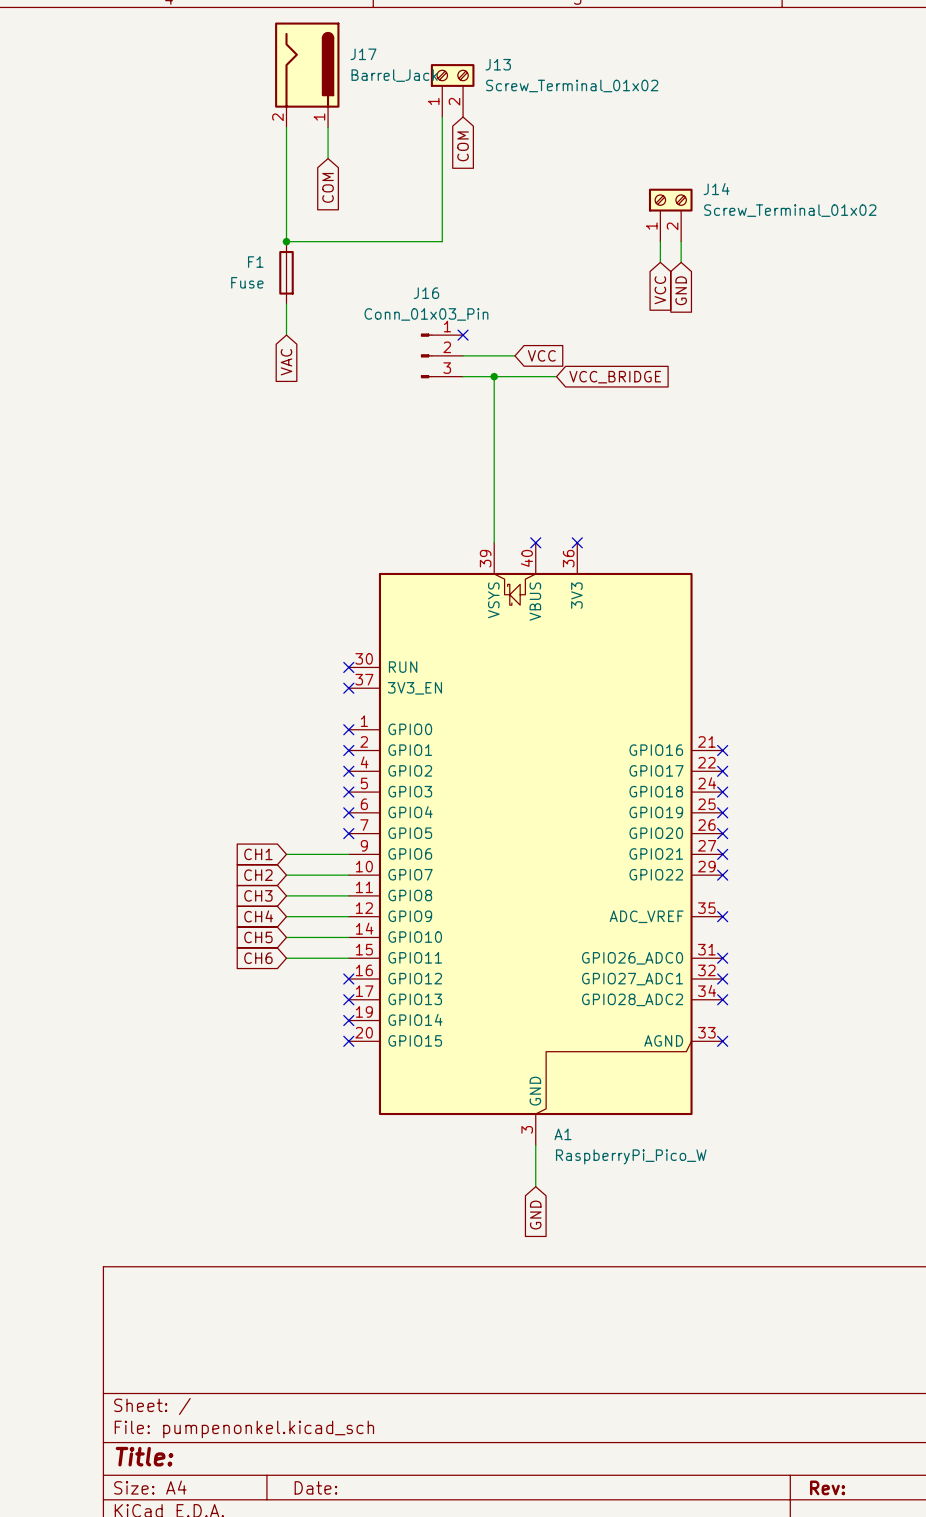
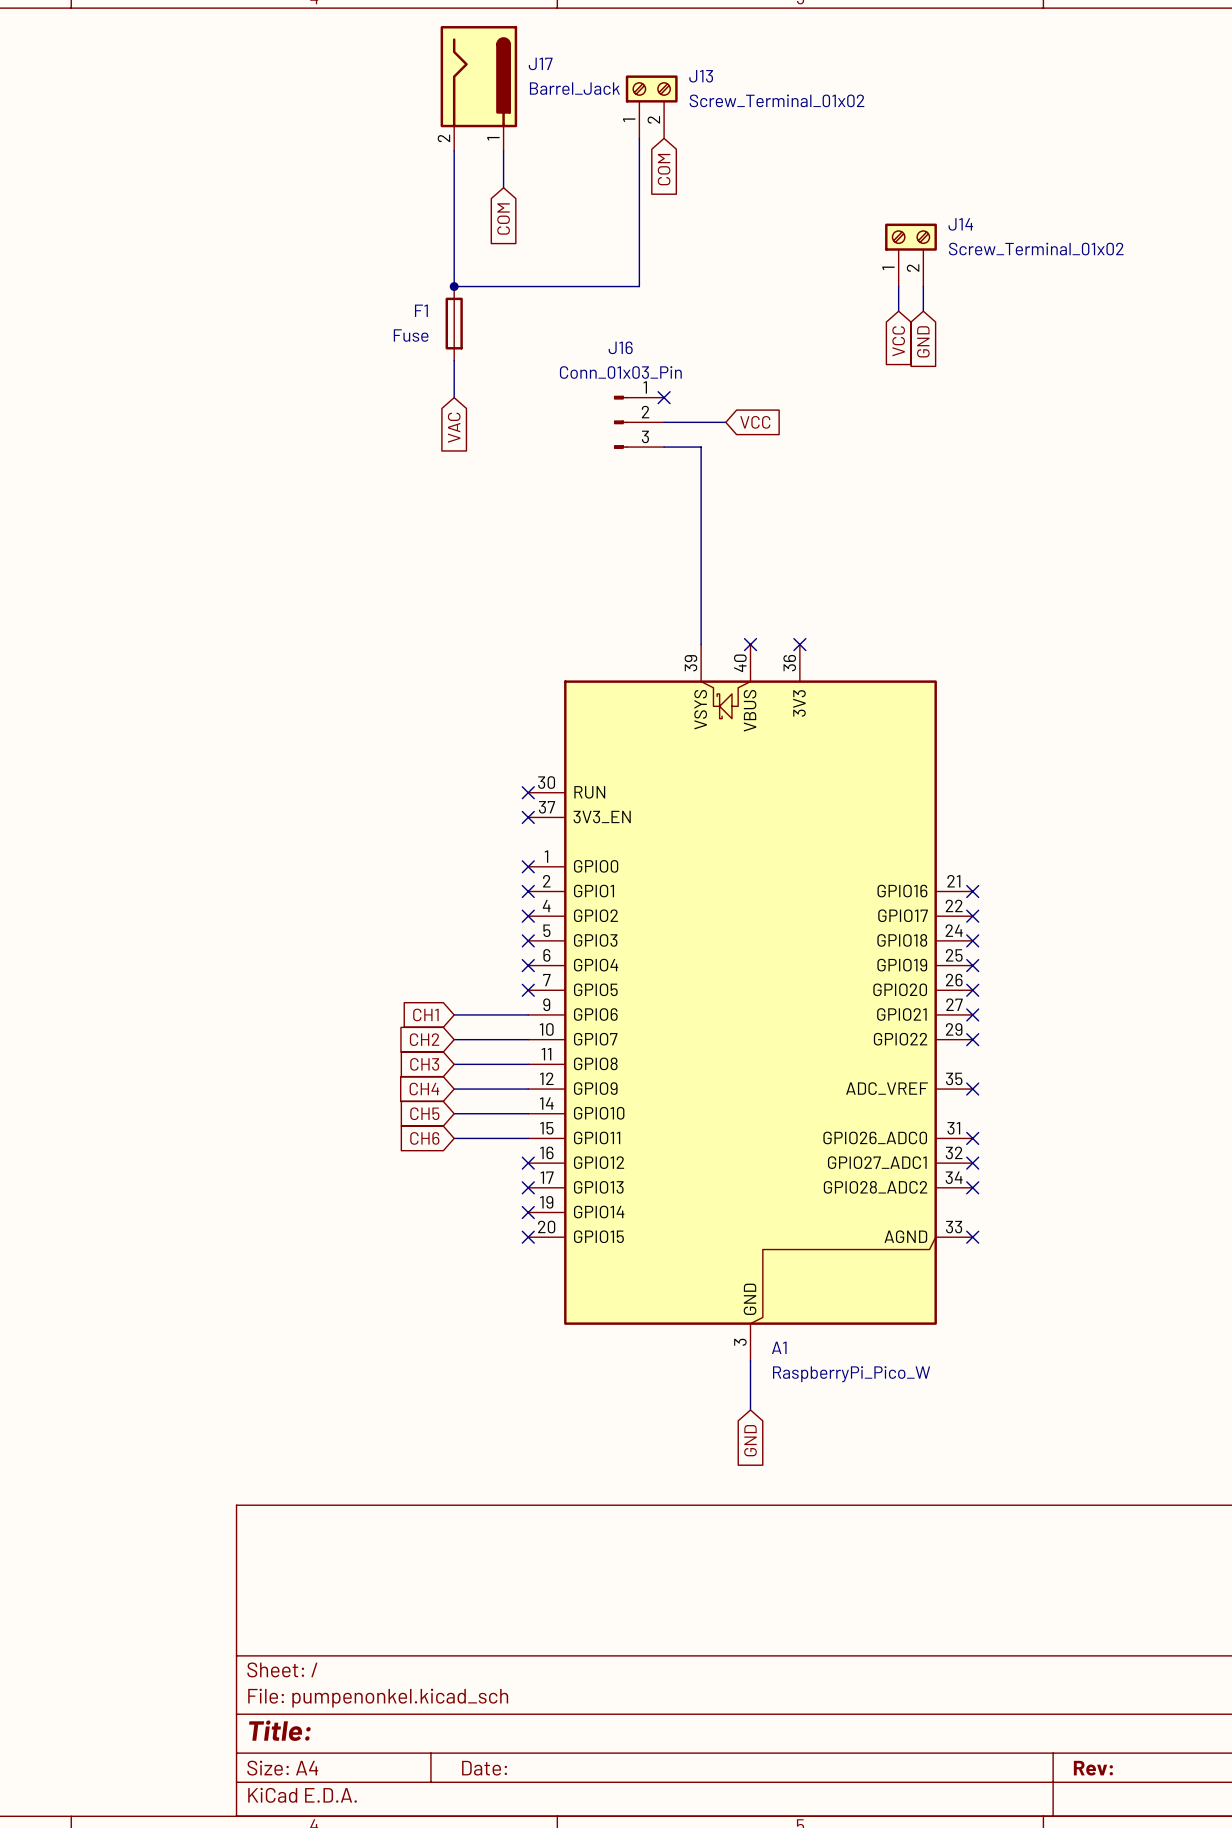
wire: (494, 376) (556, 376) -> none
junction: (494, 376) -> none
global label: VCC_BRIDGE (615, 377) -> none

